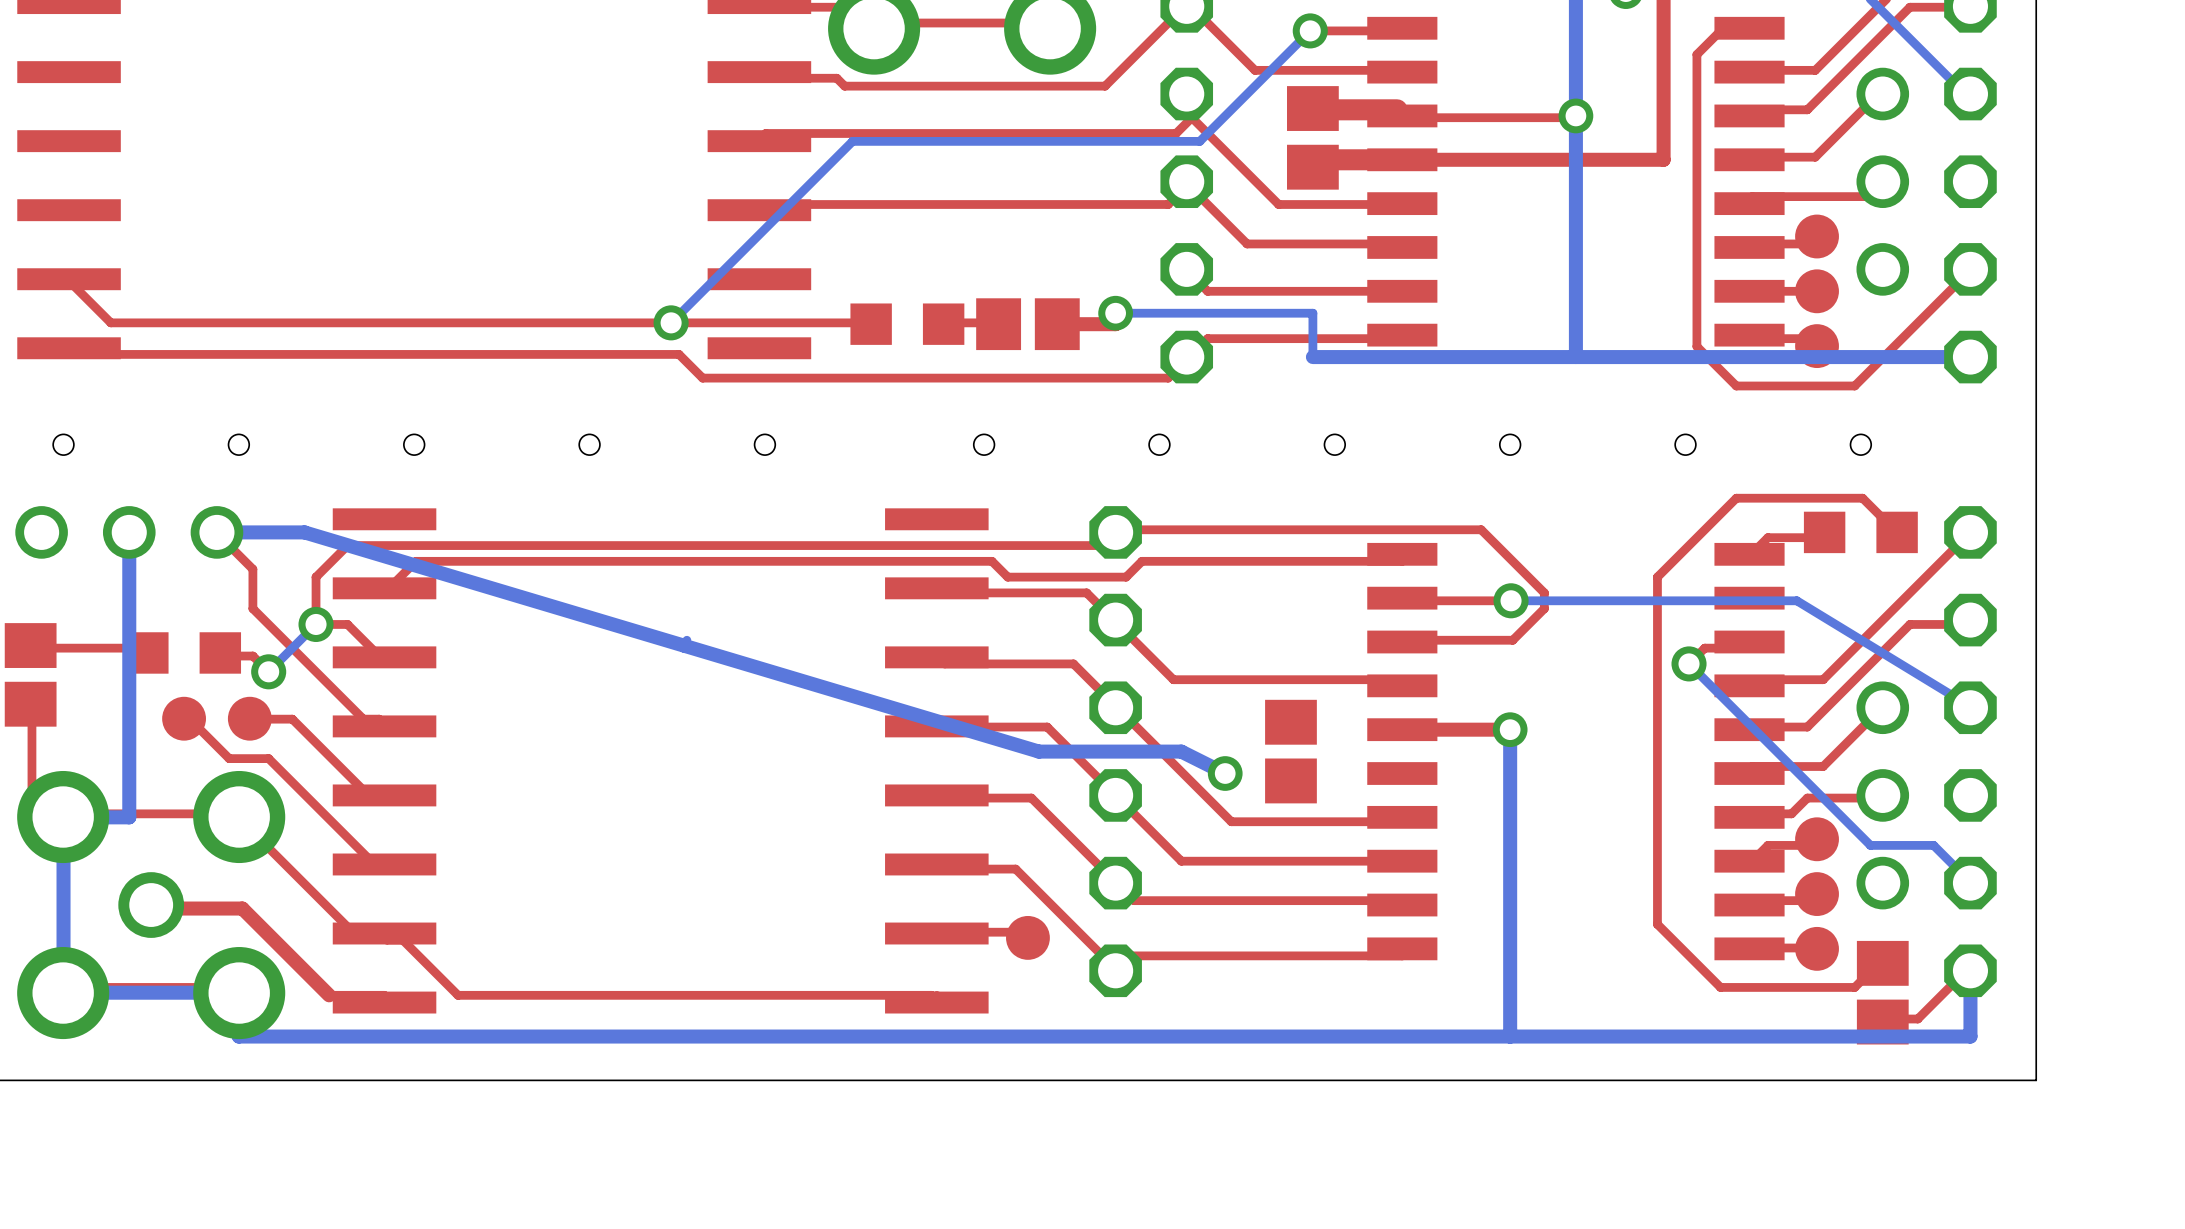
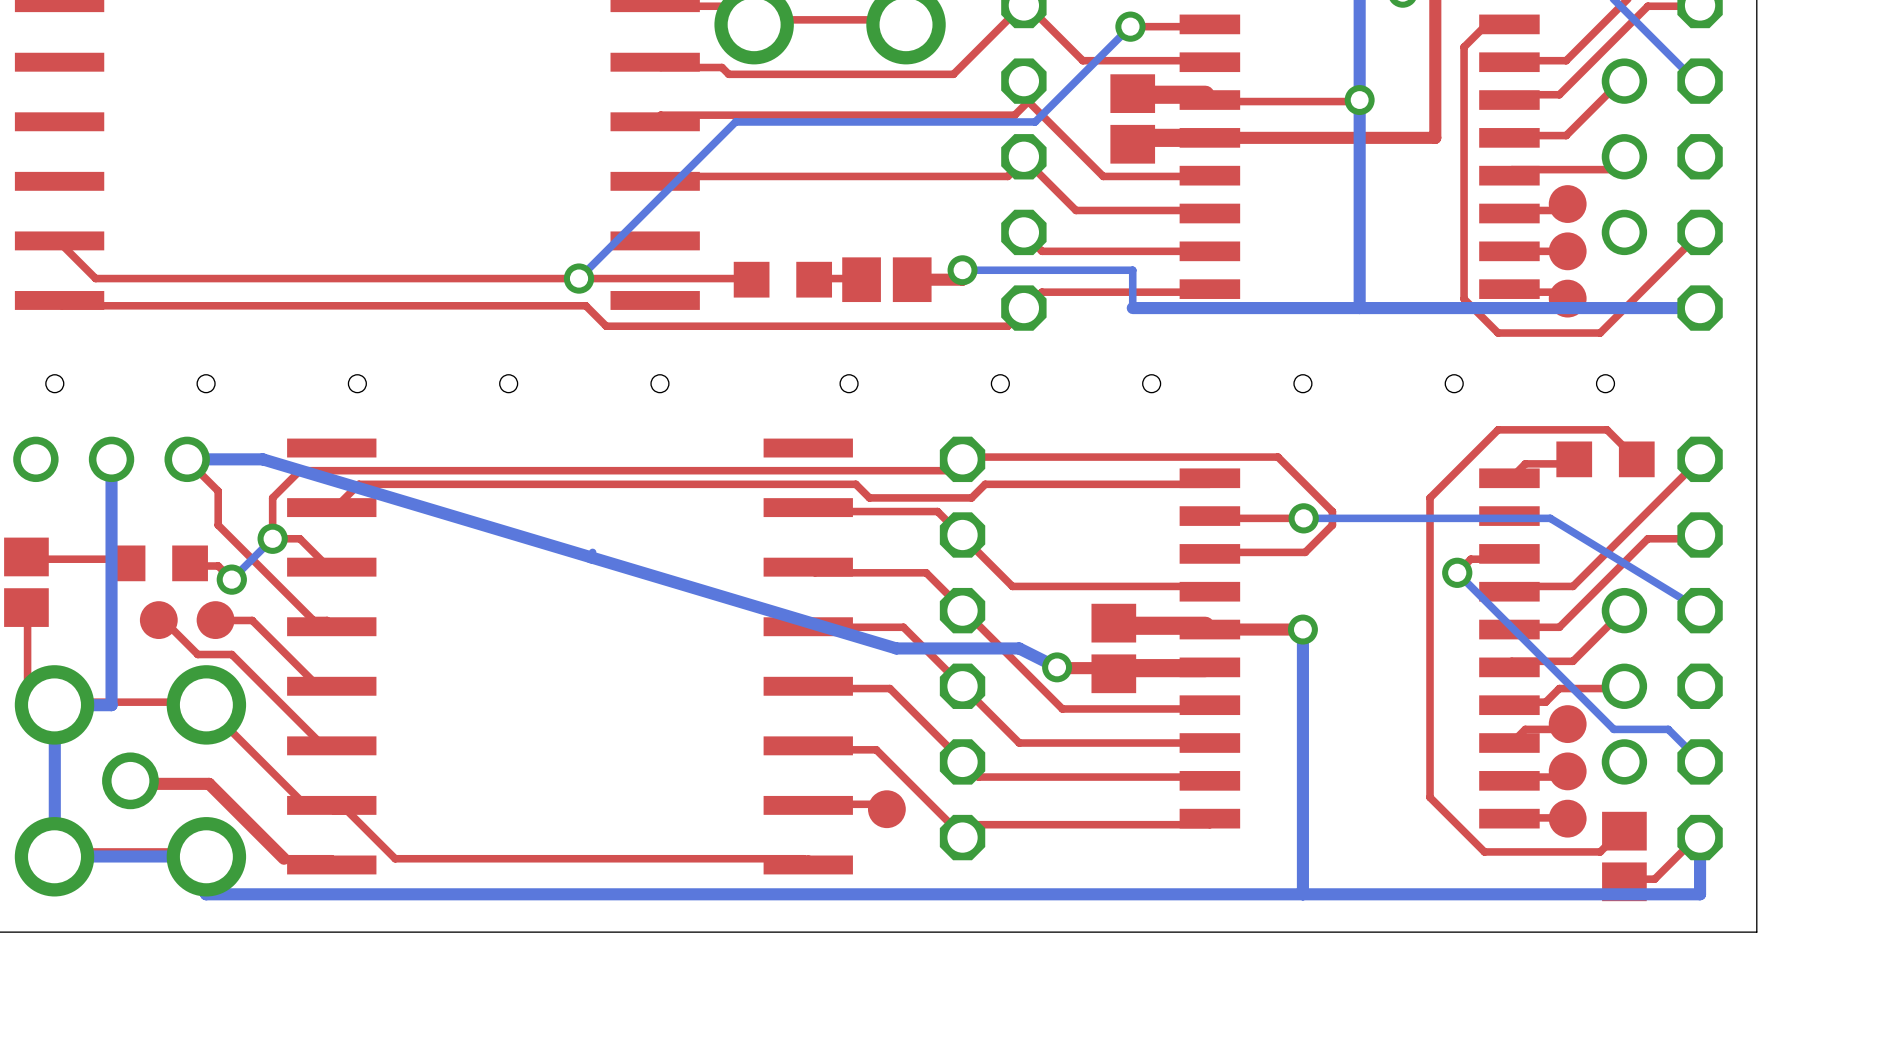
top track: none -> (1113, 623) (1116, 625) (1205, 625) (1209, 629)
top track: none -> (1209, 667) (1116, 668) (1113, 673) (1110, 668) (1057, 667)

